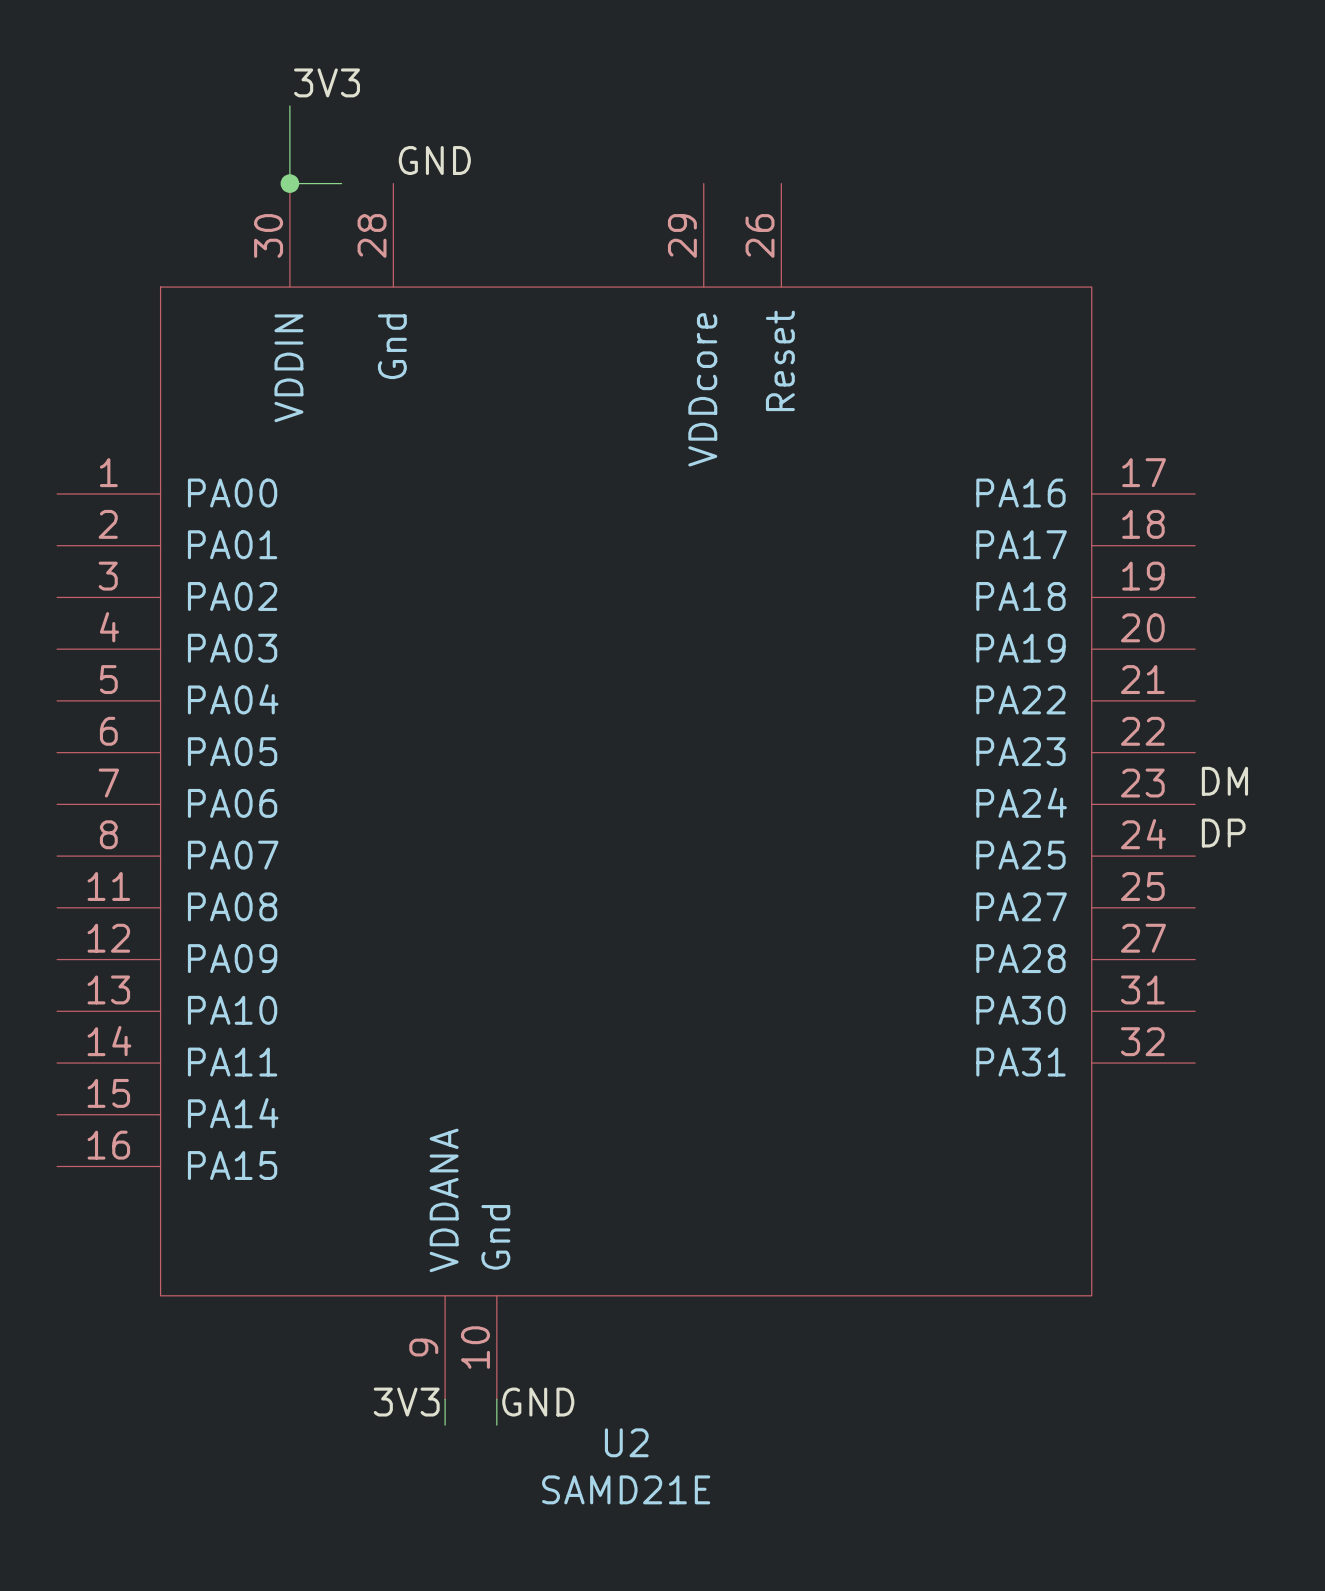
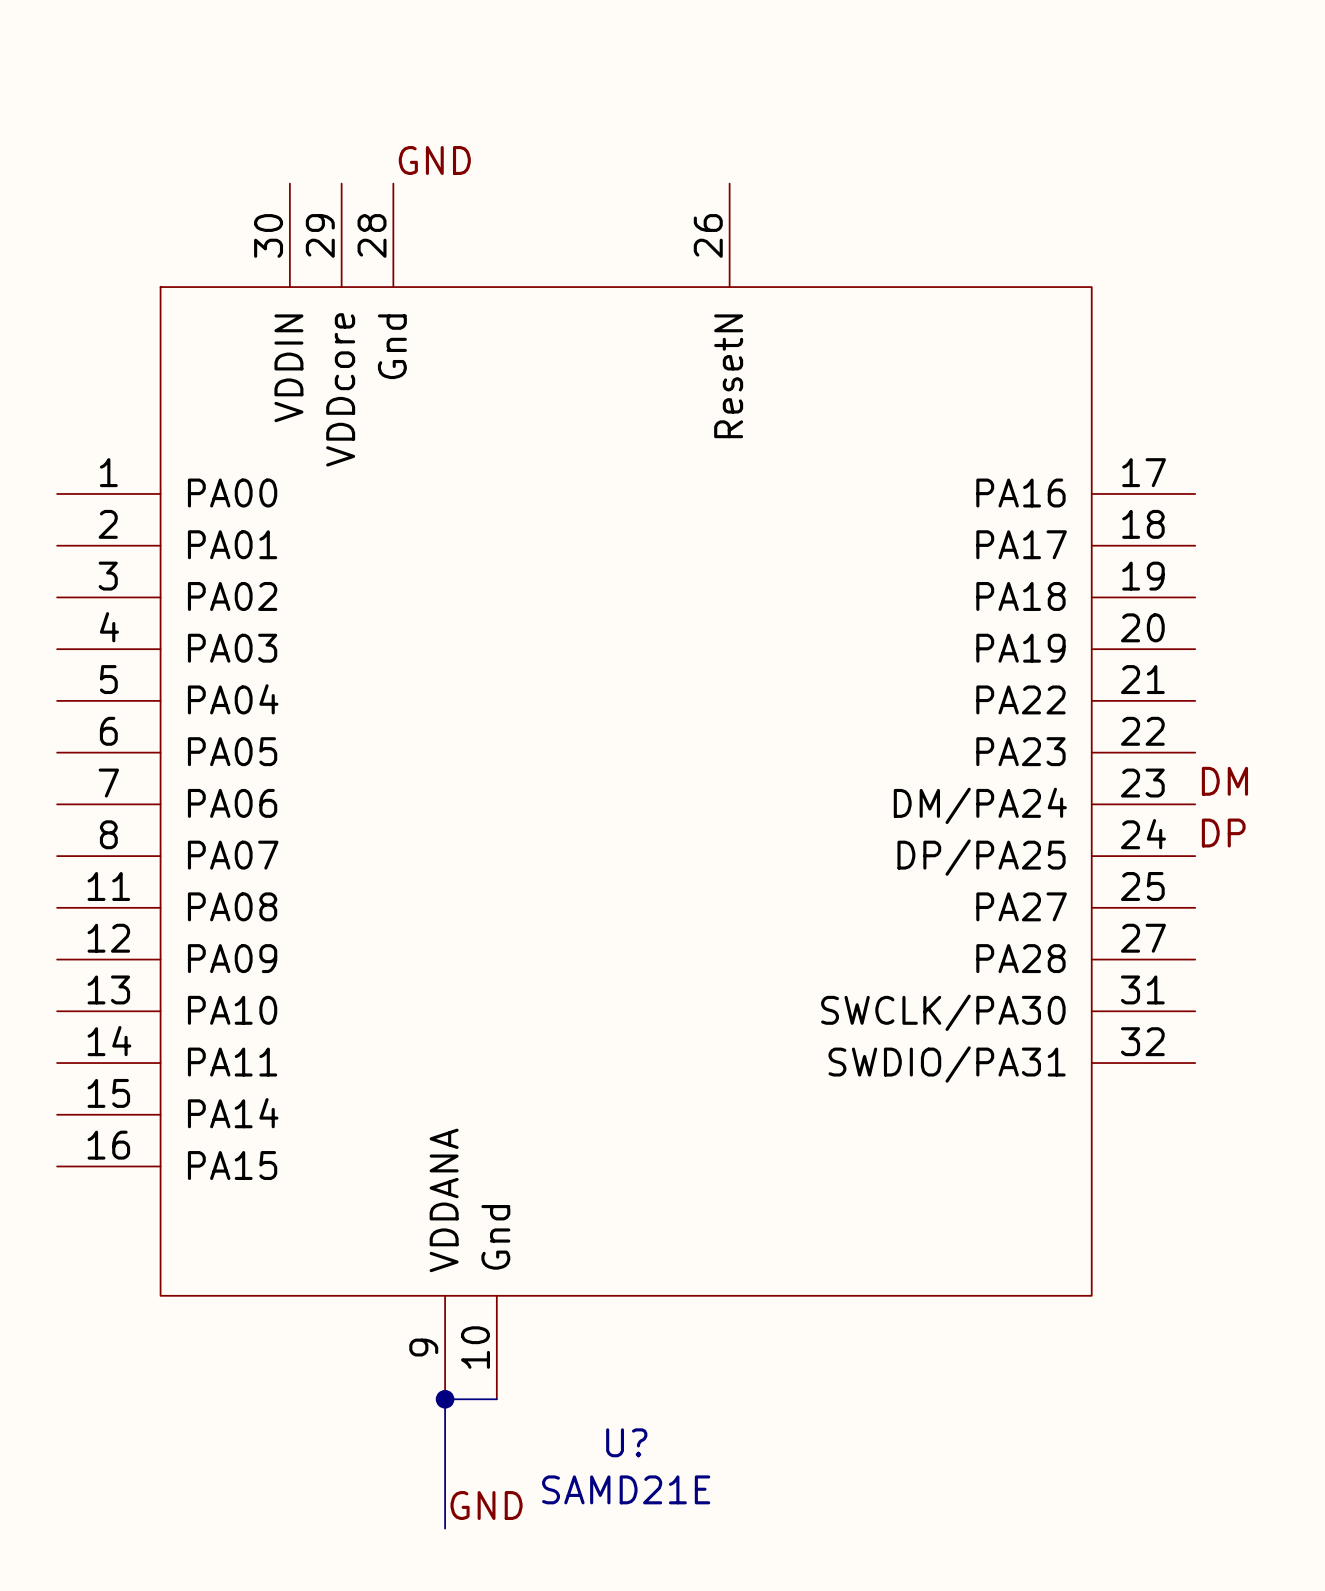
label: 3V3 (327, 82) -> none
wire: (289, 105) (289, 183) (341, 183) -> none
junction: (289, 183) -> none
U2: SAMD21E (626, 791) -> none
U?: none -> SAMD21E (626, 791)
junction: none -> (445, 1399)
wire: (496, 1399) (496, 1425) -> (496, 1399) (445, 1399)
label: 3V3 (406, 1402) -> none
label position: GND (538, 1402) -> GND (486, 1505)
wire: none -> (445, 1425) (445, 1528)

